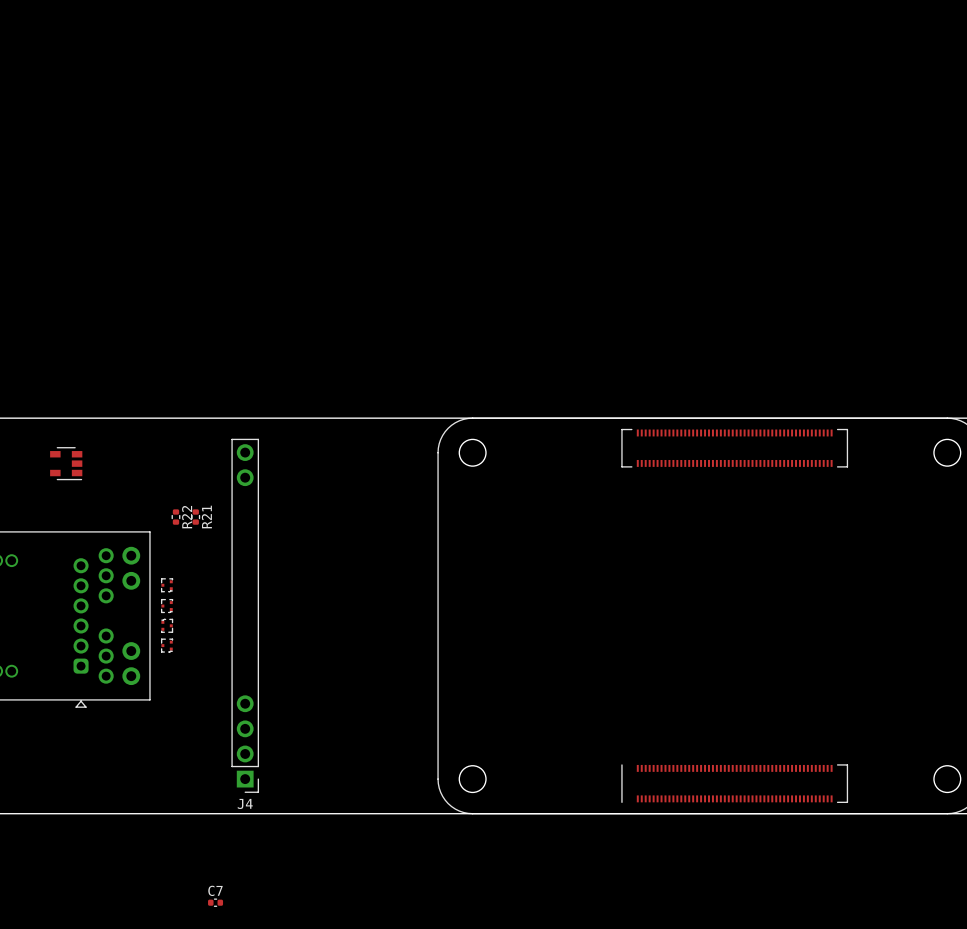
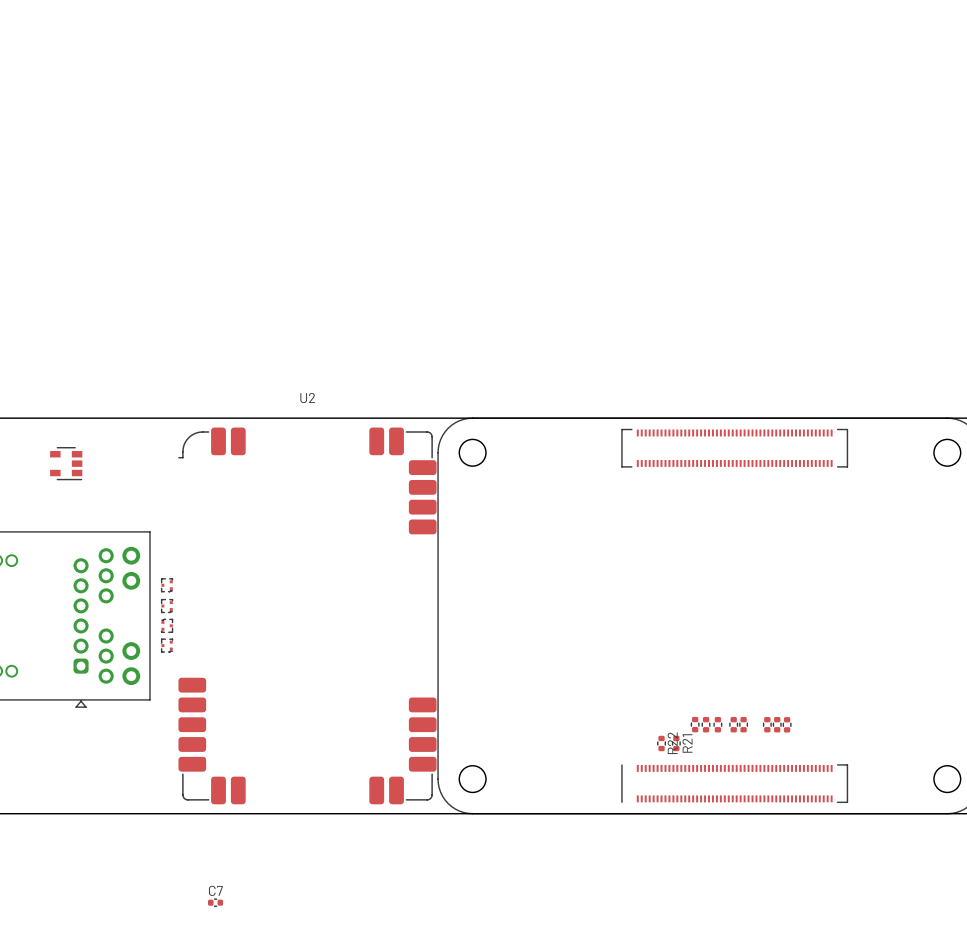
R22 position: (175, 517) -> (661, 743)
R21 position: (195, 517) -> (676, 743)
J4: (245, 615) -> none
U2: none -> (307, 615)
part: none -> (695, 724)
part: none -> (706, 724)
part: none -> (717, 724)
part: none -> (733, 724)
part: none -> (743, 724)
part: none -> (767, 724)
part: none -> (777, 724)
part: none -> (787, 724)

